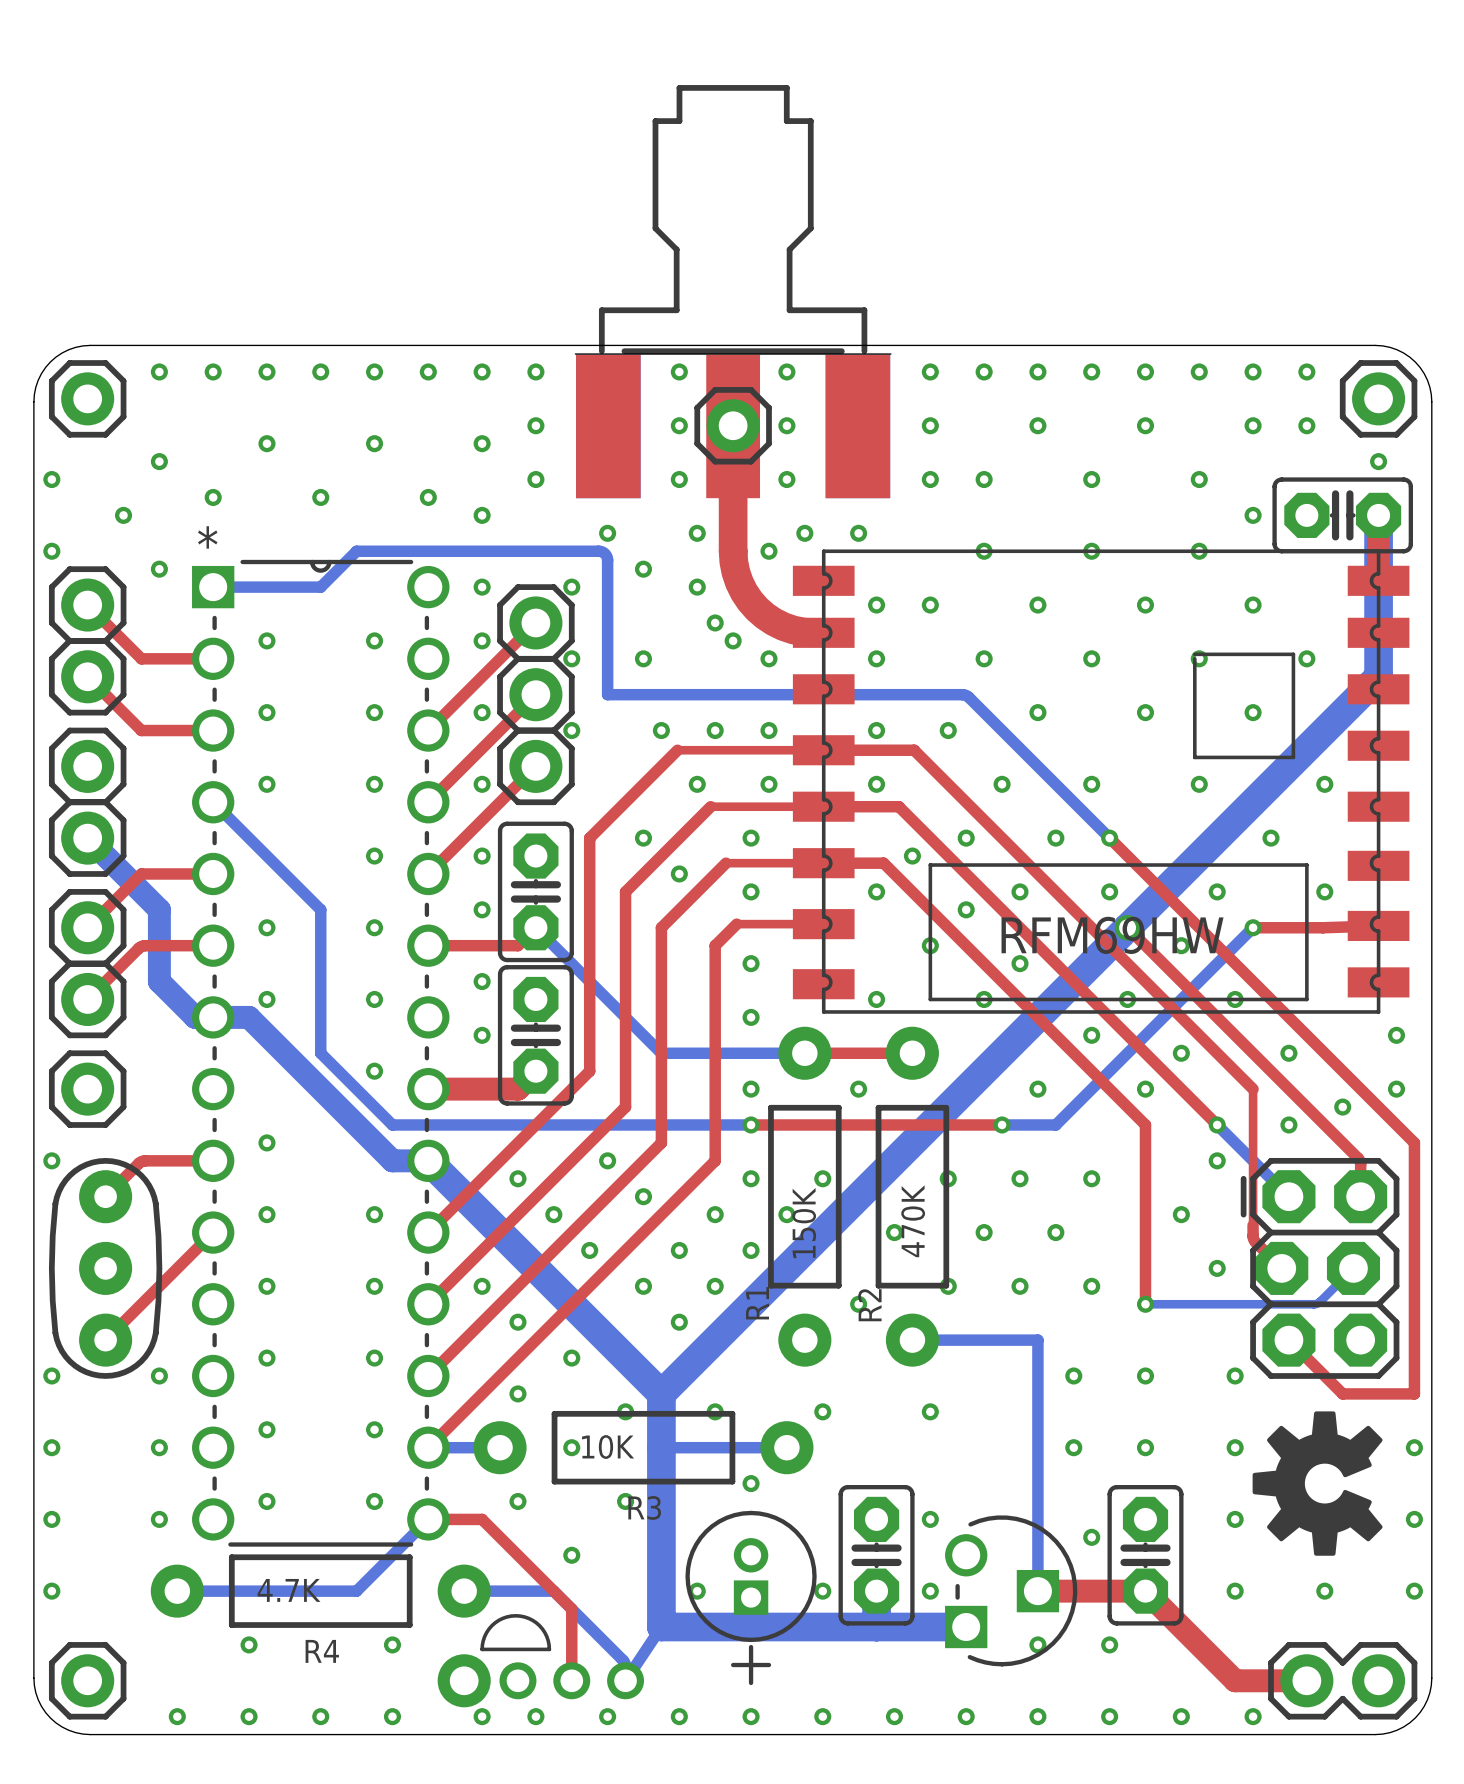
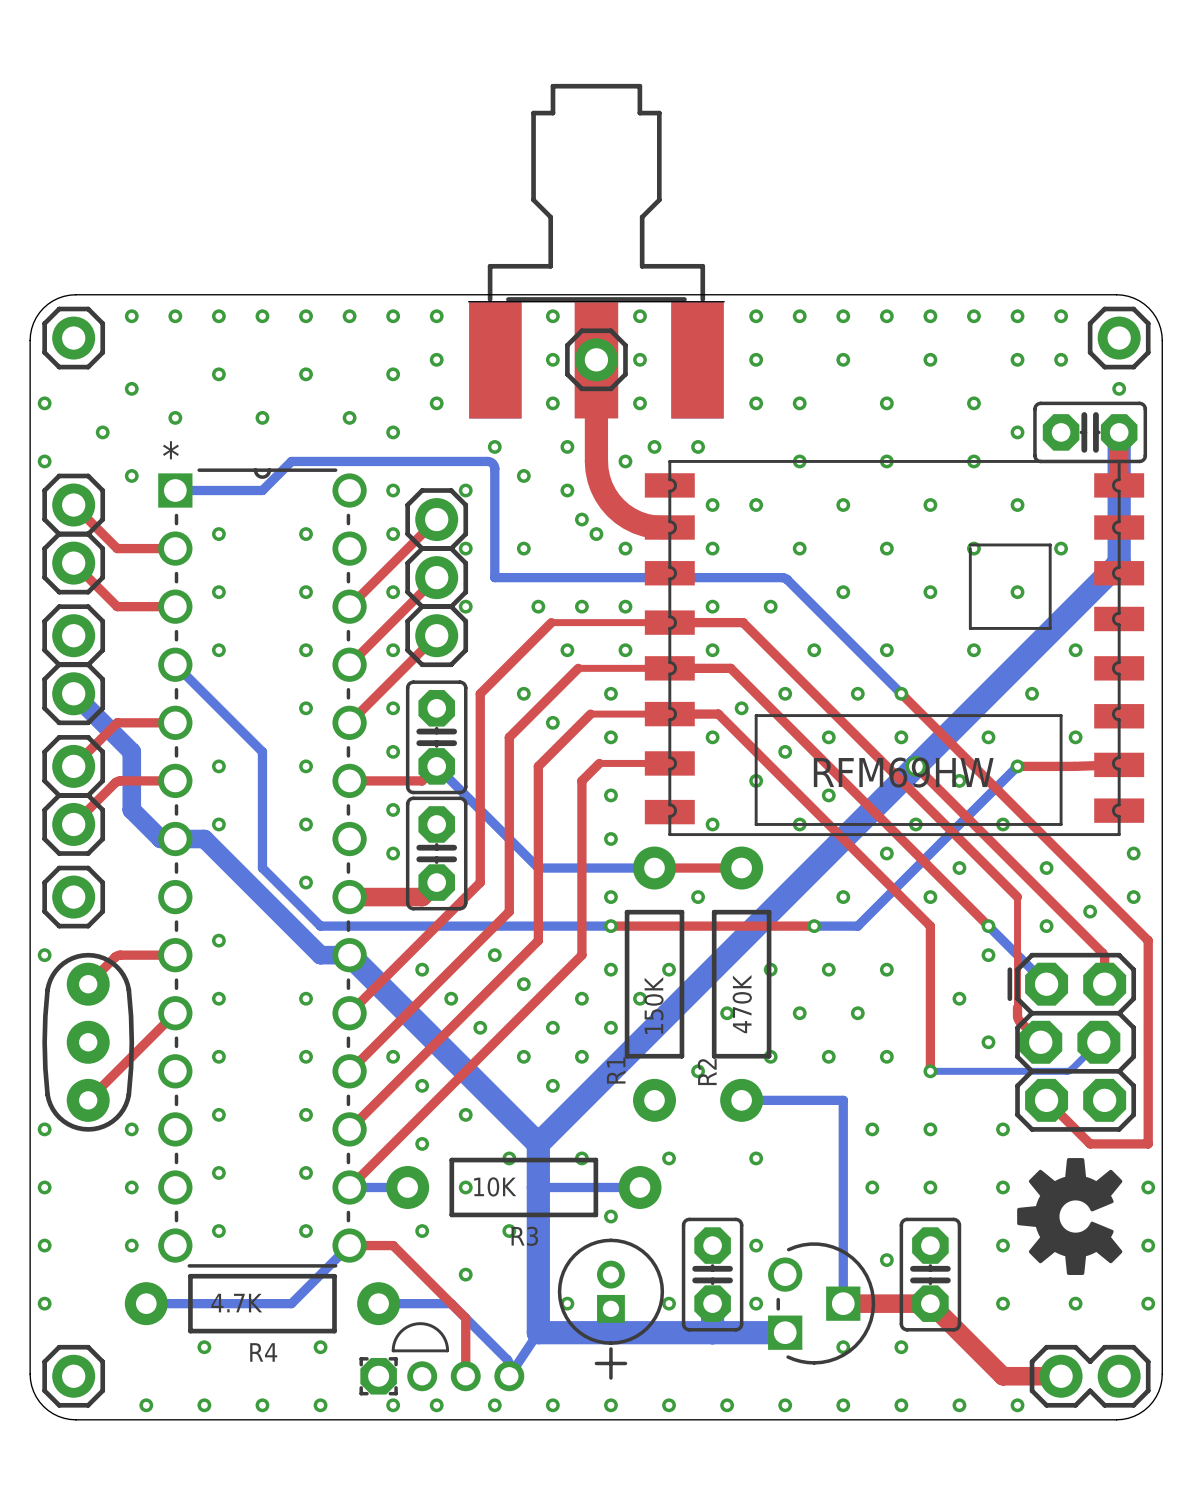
part footprint: [437, 1654, 491, 1708] -> [359, 1357, 398, 1396]

